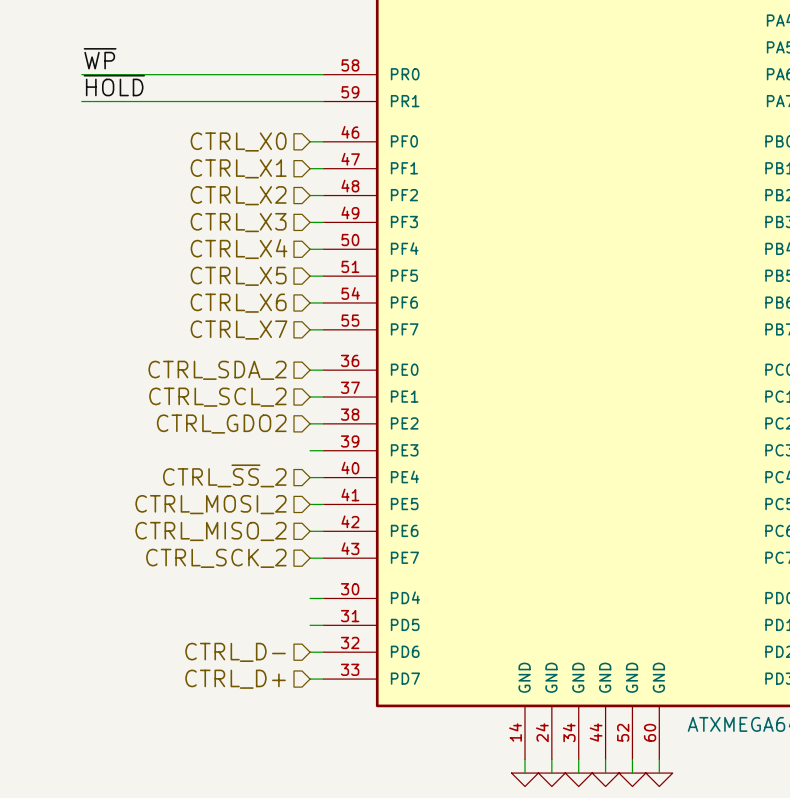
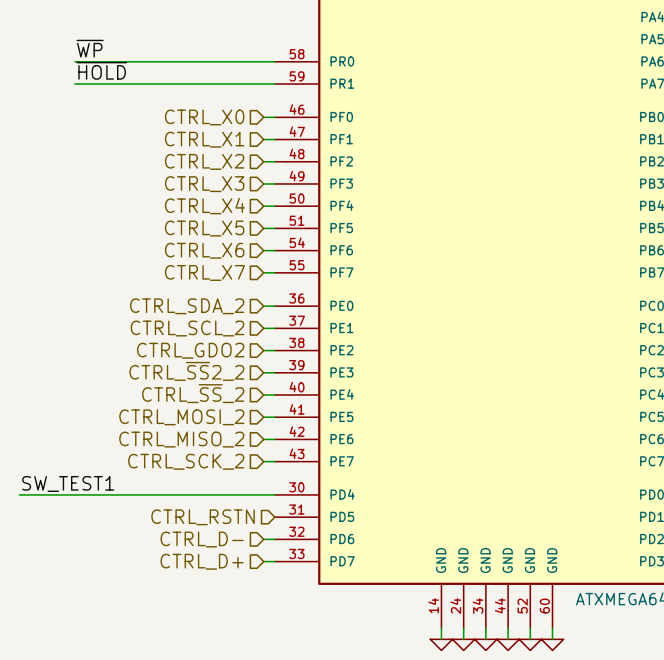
hierarchical label: none -> CTRL_~{SS}2_2 (186, 371)
label: none -> SW_TEST1 (68, 483)
wire: none -> (19, 494) (263, 494)
hierarchical label: none -> CTRL_RSTN (203, 517)
wire: (310, 625) (323, 625) -> none

